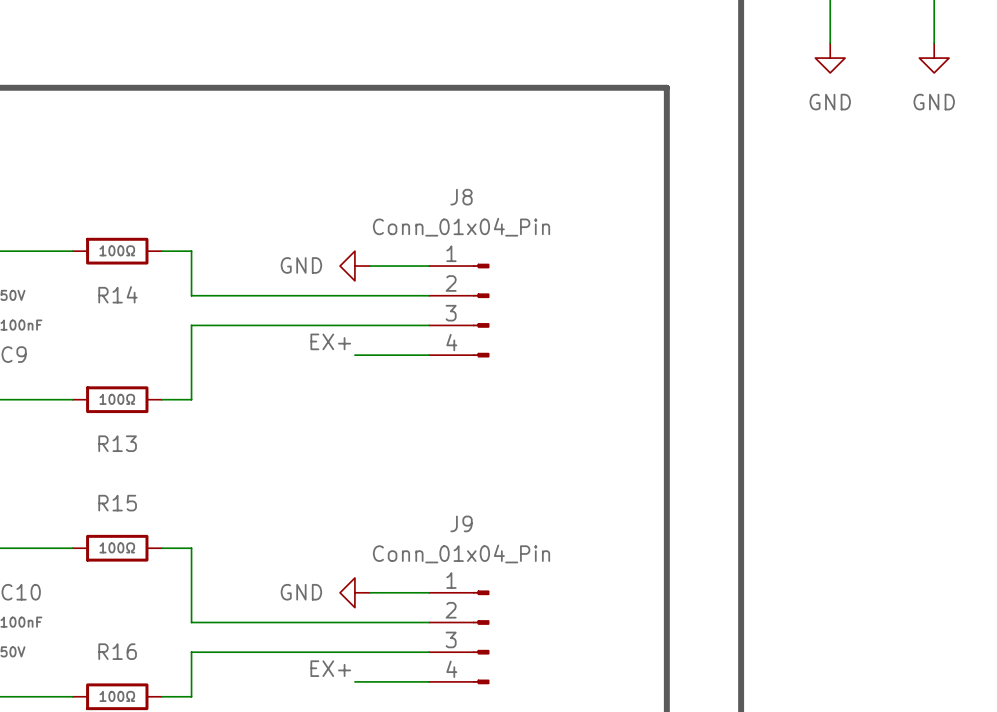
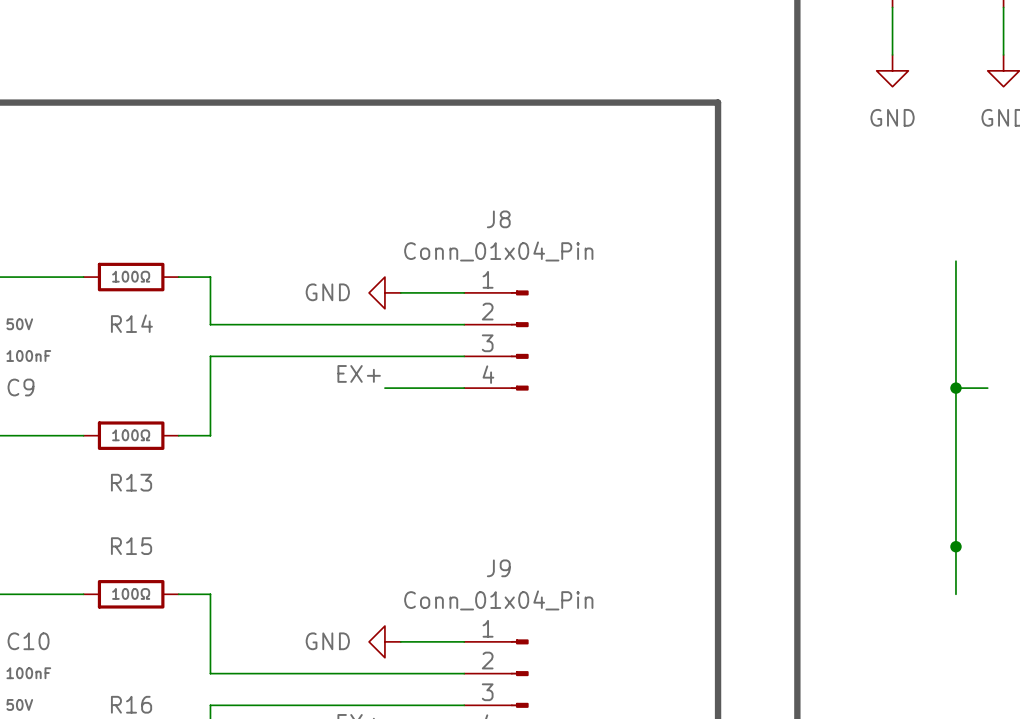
wire: none -> (955, 261) (955, 594)
wire: none -> (955, 388) (987, 388)
junction: none -> (955, 388)
junction: none -> (955, 546)

